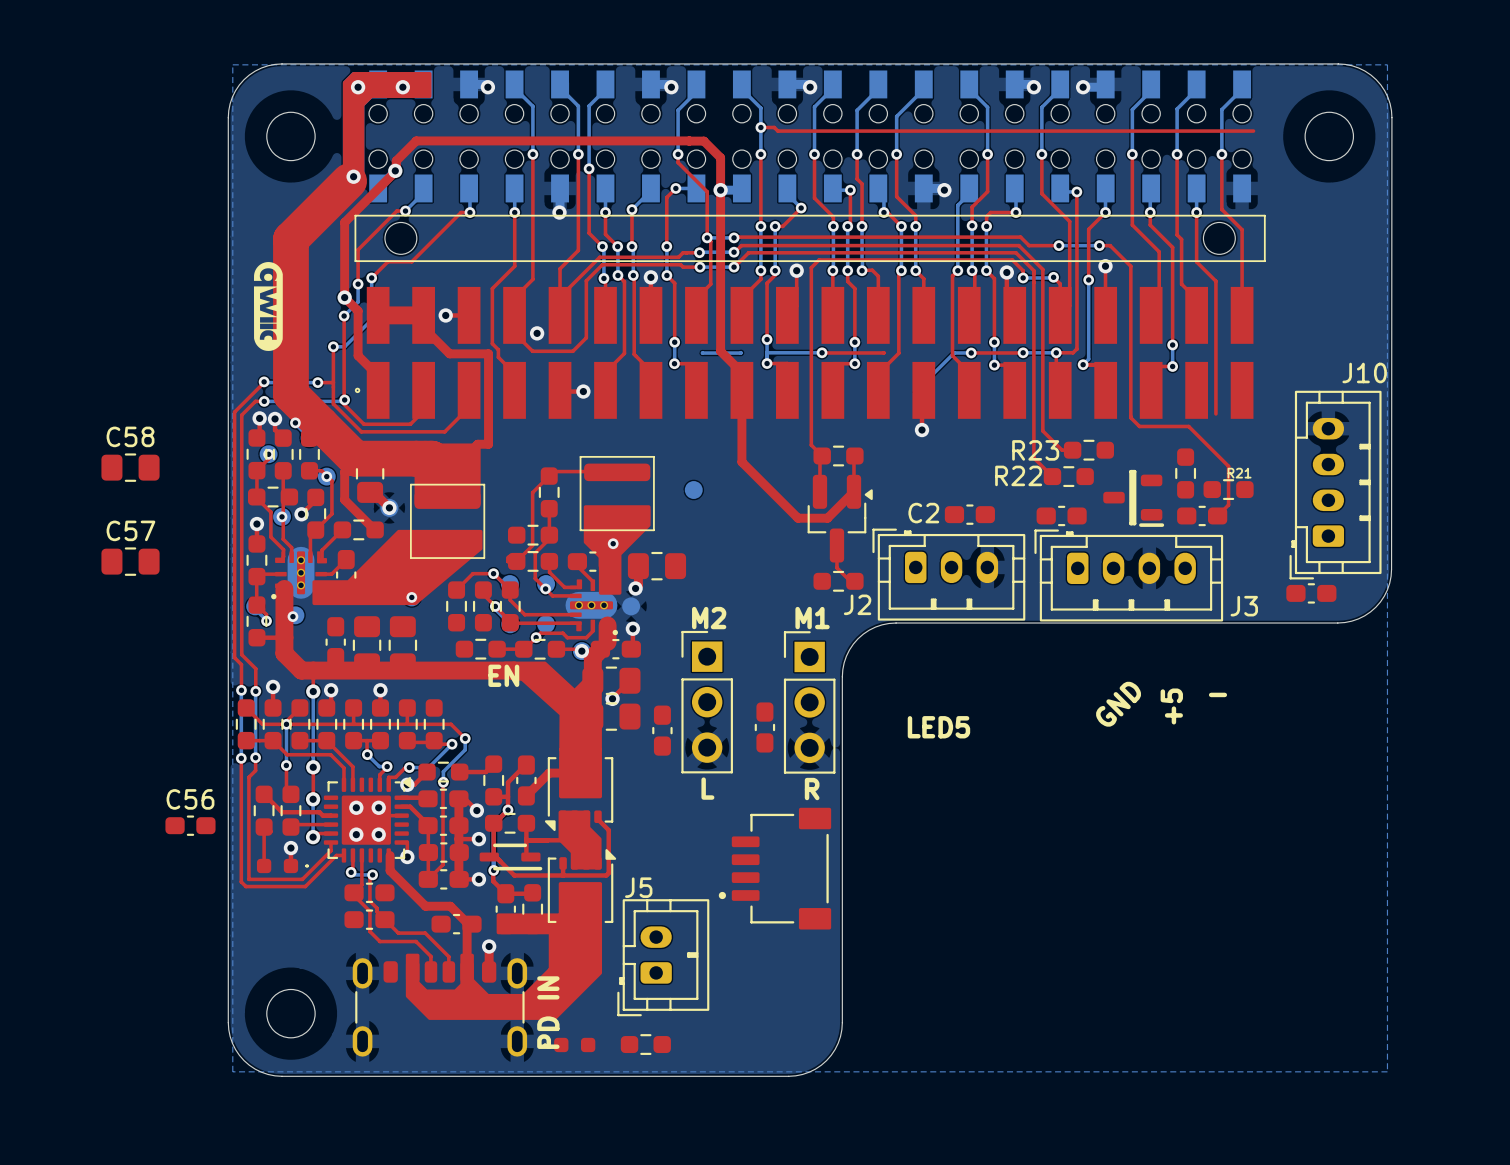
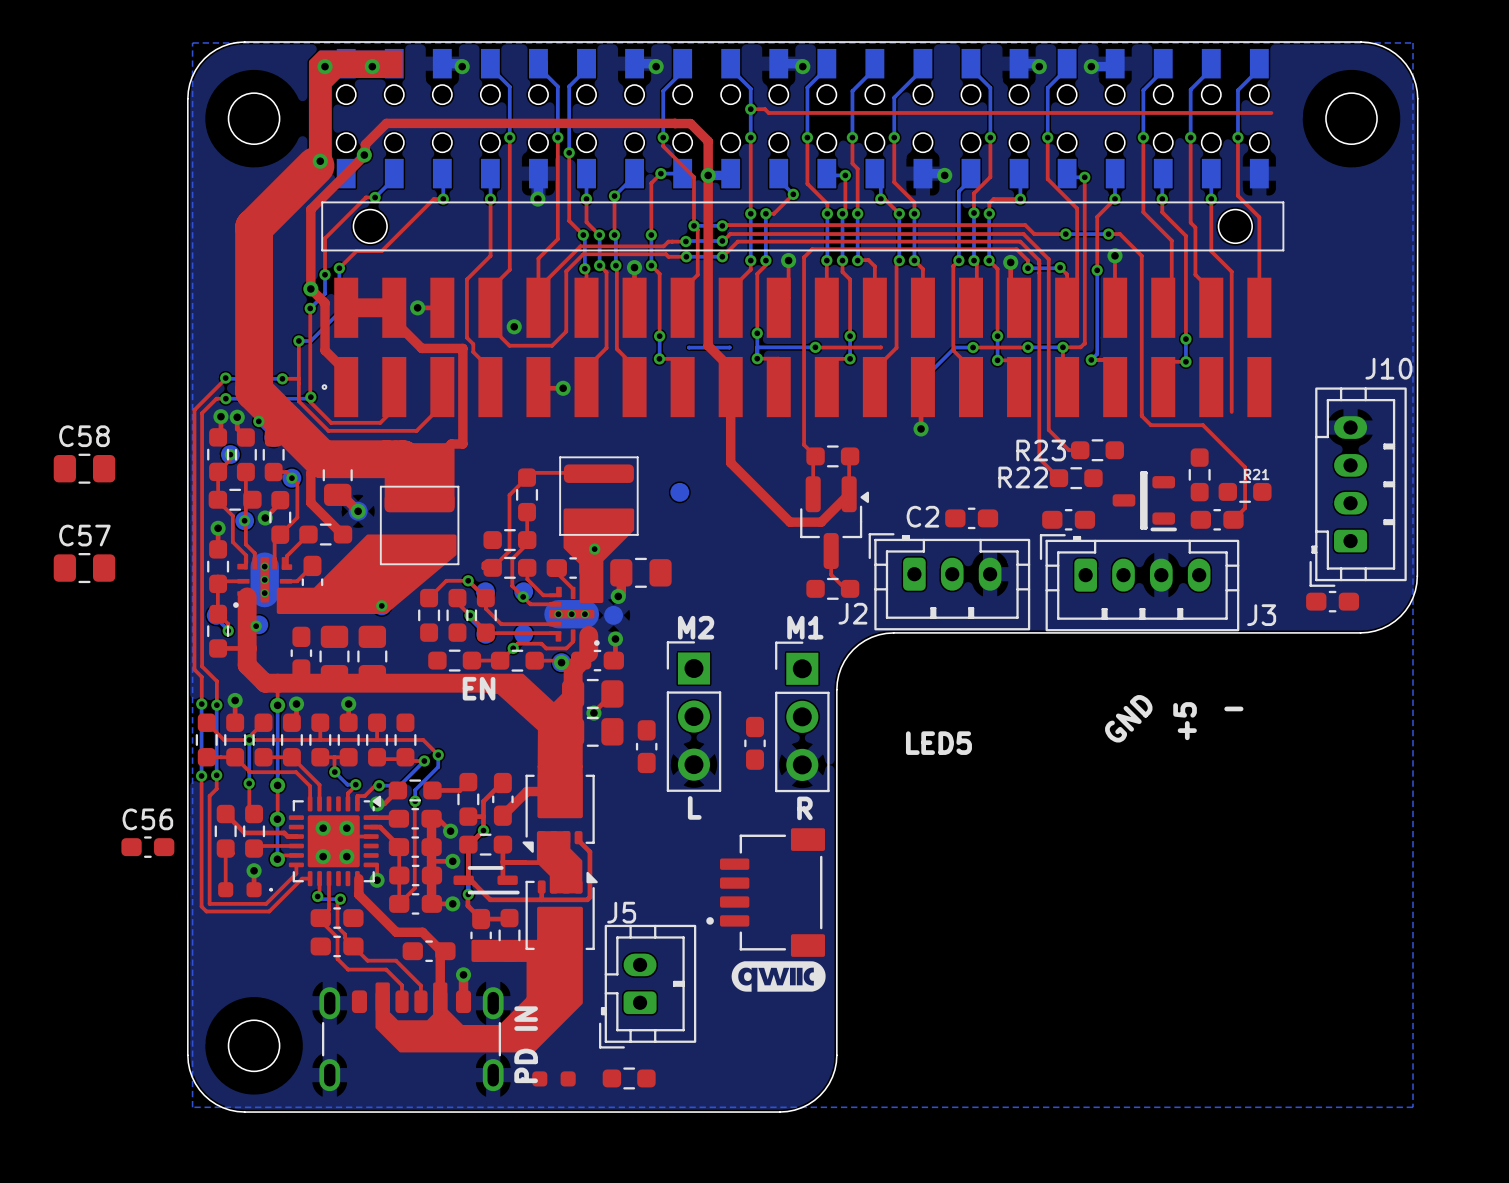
drawing: [253, 262, 283, 351] -> none
drawing: none -> [731, 961, 826, 992]

